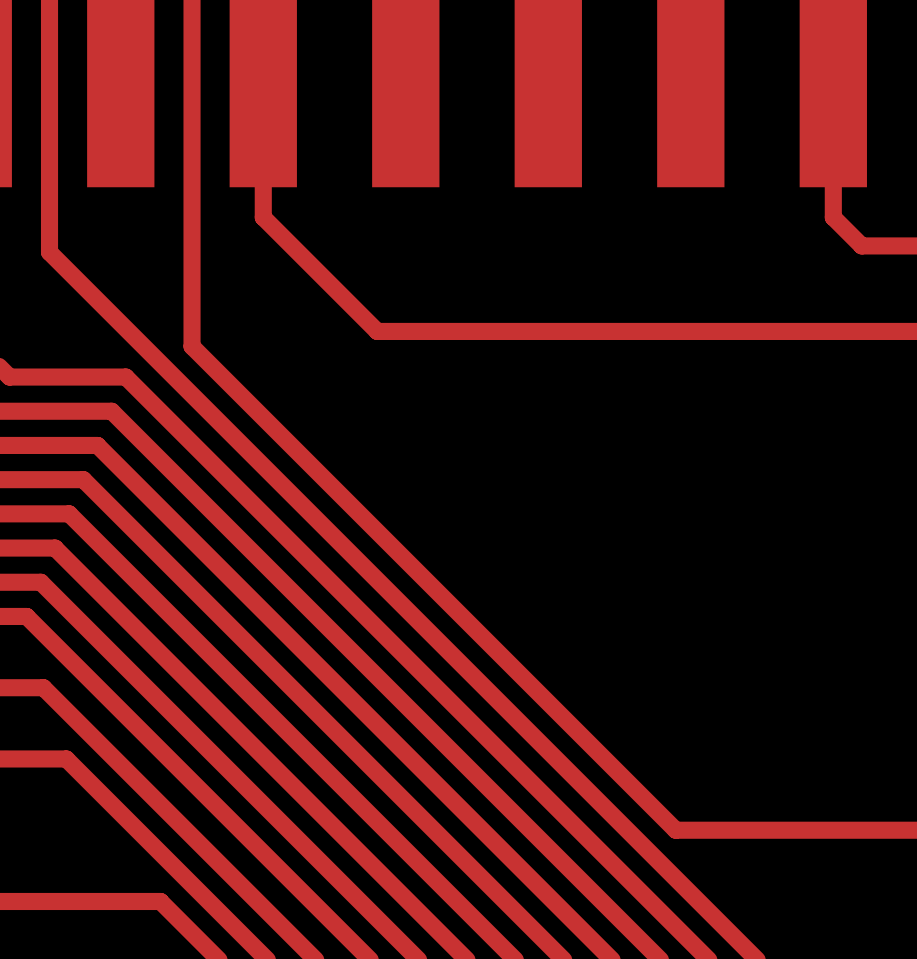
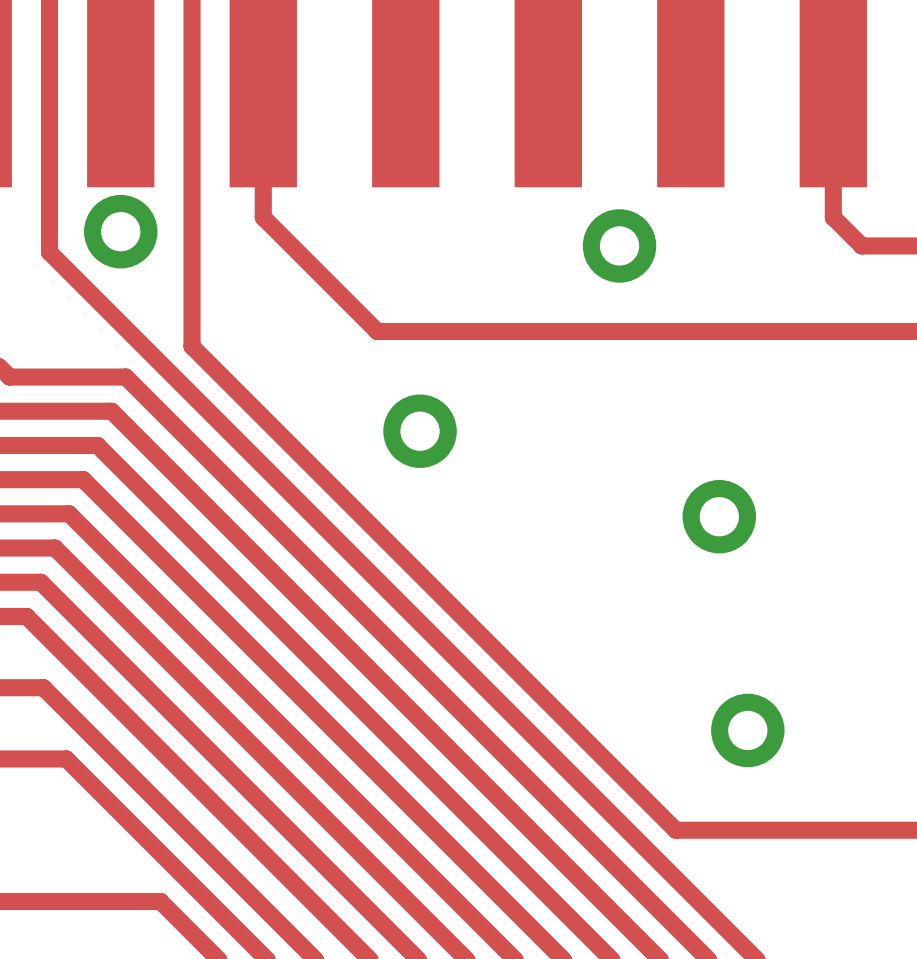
via: none -> (120, 231)
via: none -> (619, 245)
via: none -> (420, 431)
via: none -> (719, 516)
via: none -> (747, 730)

